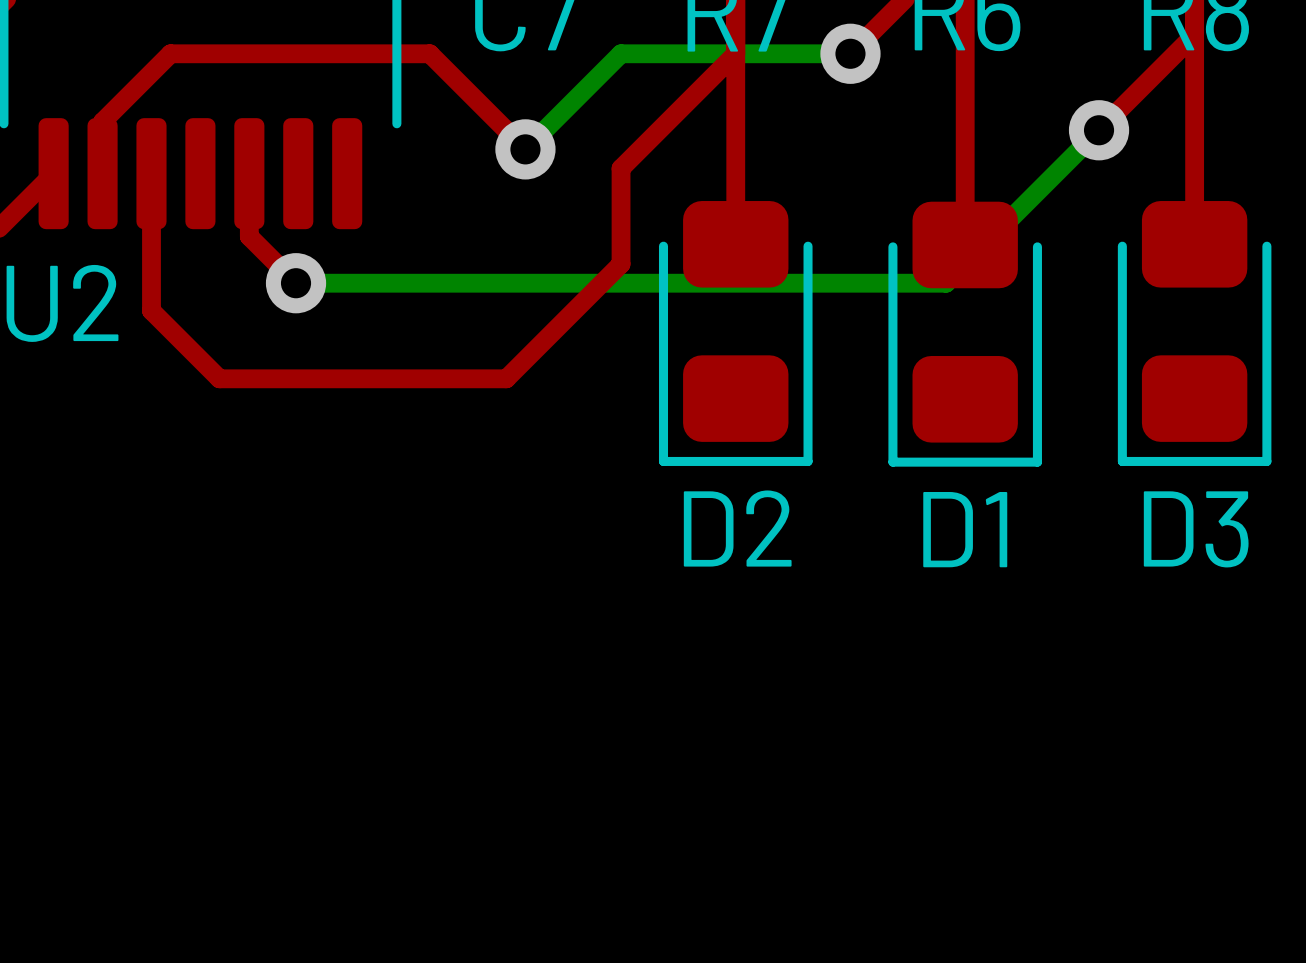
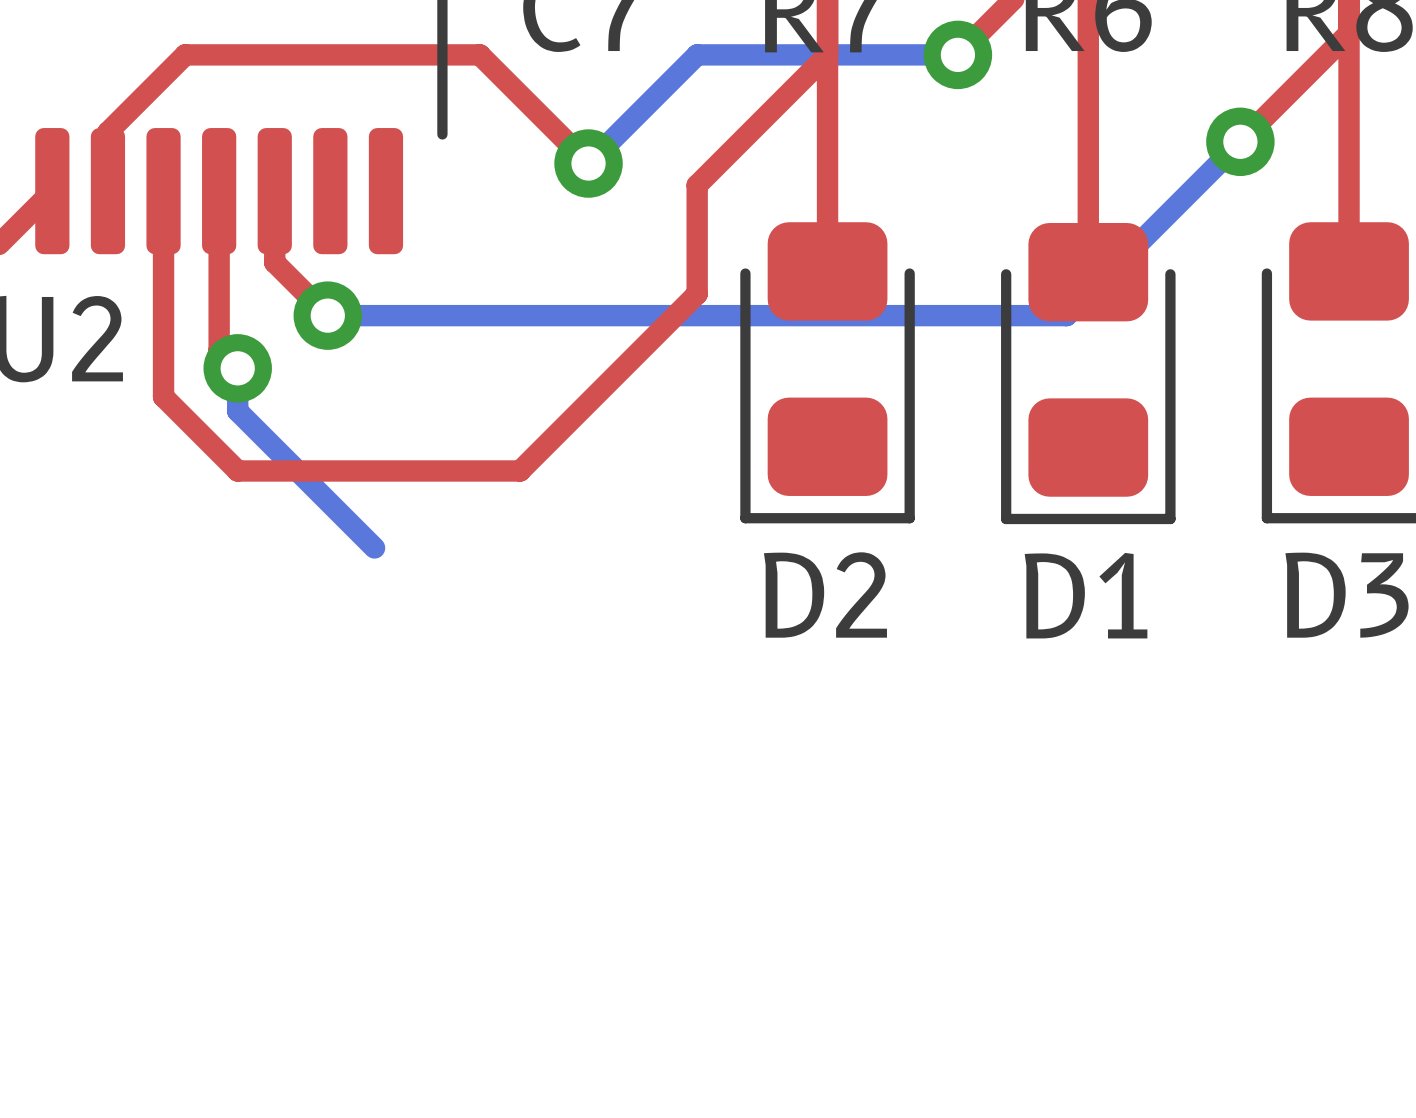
top track: none -> (219, 191) (219, 349) (237, 368)
top track: (151, 310) (219, 378) (506, 378) -> (163, 346) (163, 396) (237, 470) (520, 470) (566, 424)
bottom track: none -> (237, 368) (237, 411) (374, 547)
via: none -> (237, 368)

